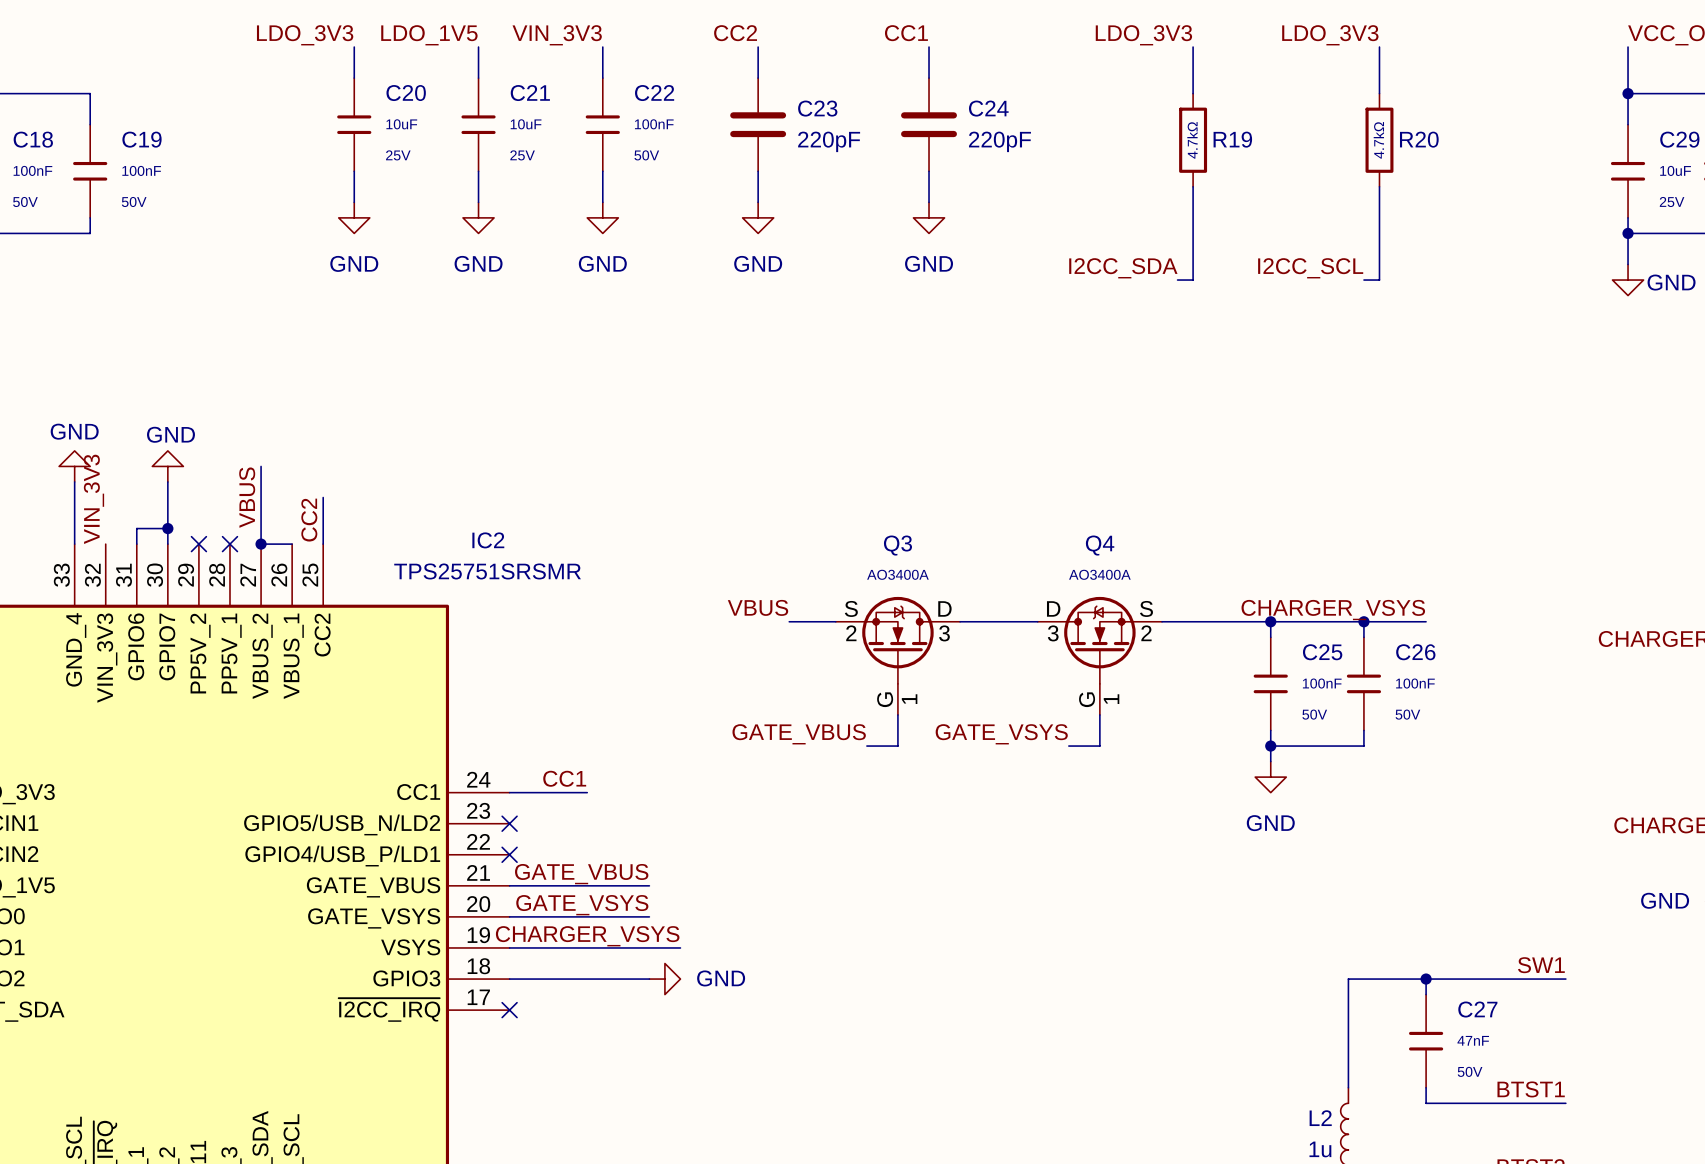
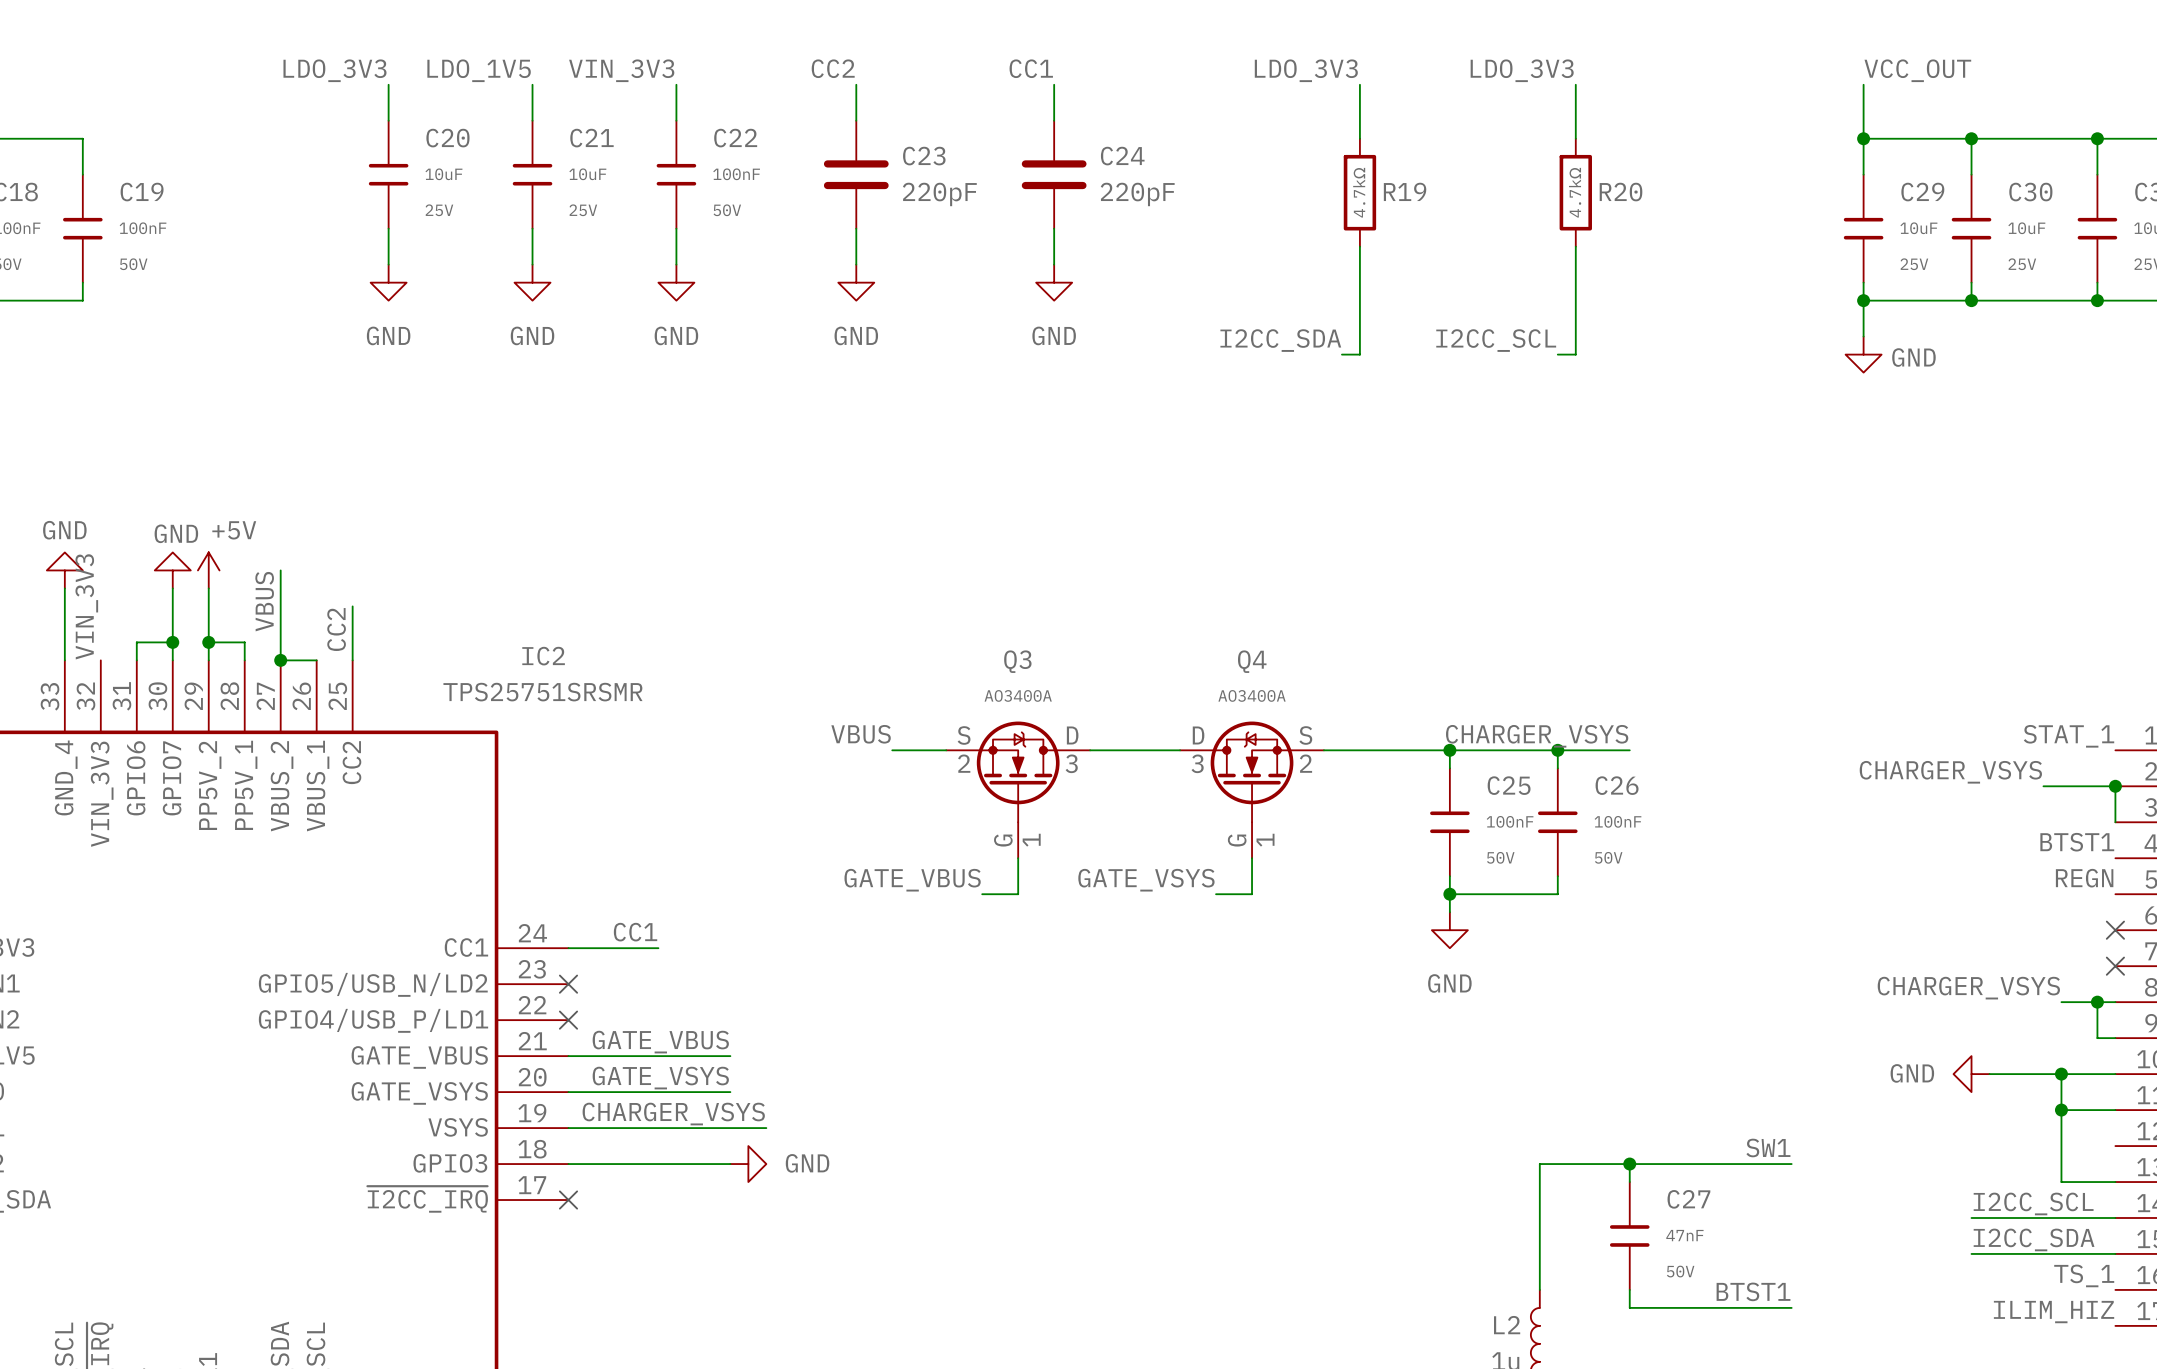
power symbol: none -> +5V (208, 570)
wire: none -> (208, 588) (208, 660)
wire: none -> (208, 642) (244, 642) (244, 660)
junction: none -> (208, 642)
no-connect mark: (198, 544) -> none
no-connect mark: (229, 544) -> none

